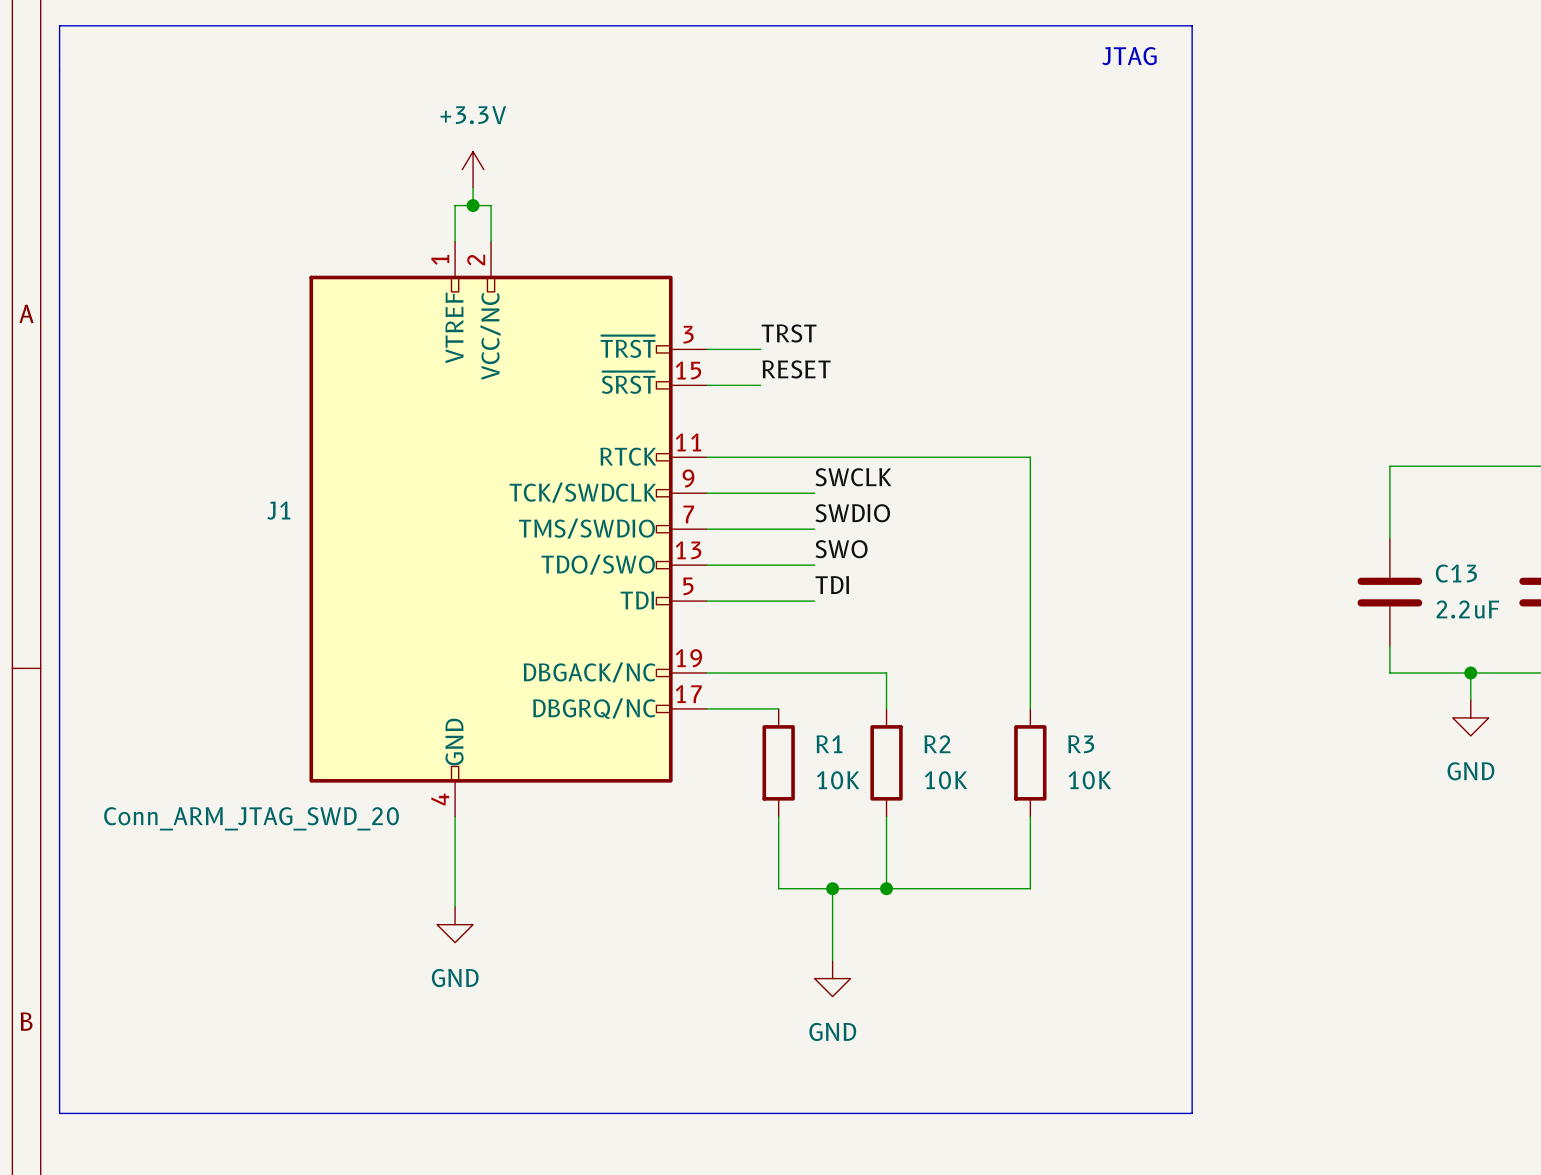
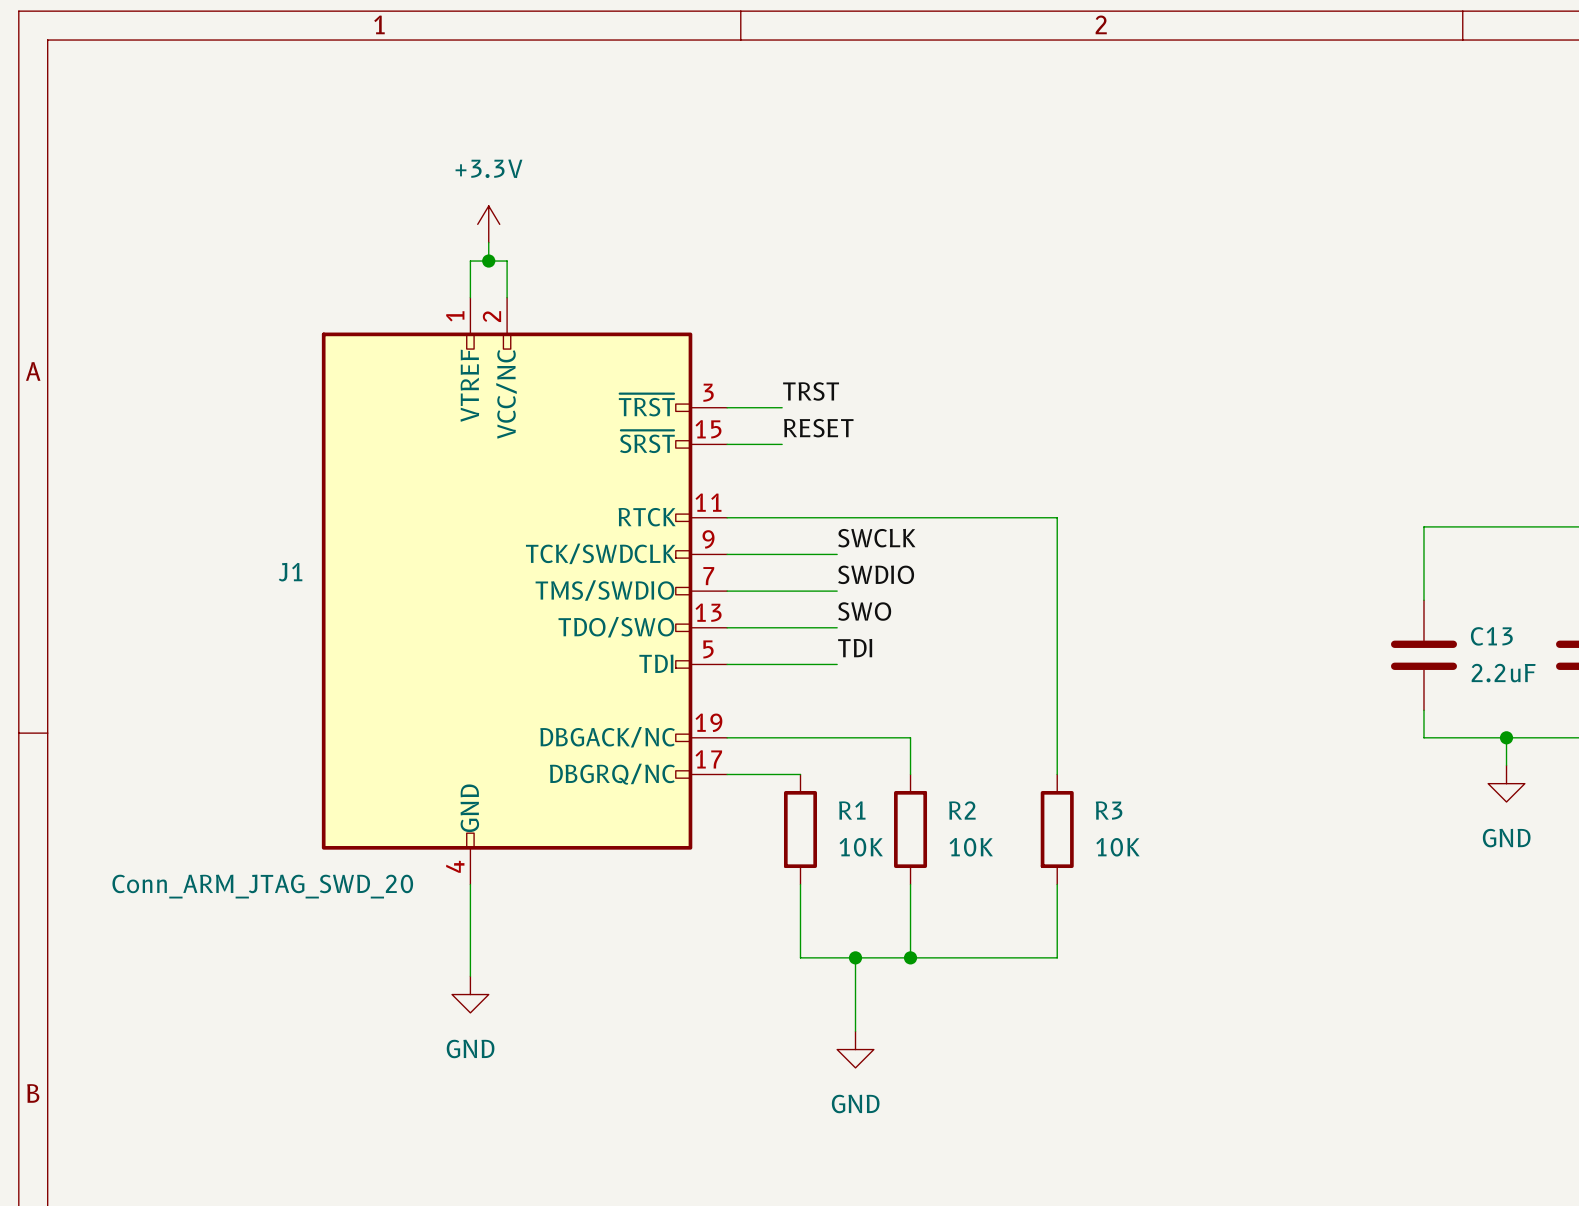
line: (59, 25) (1192, 25) (1192, 1113) (59, 1113) (59, 25) -> none
text: JTAG (1129, 56) -> none

